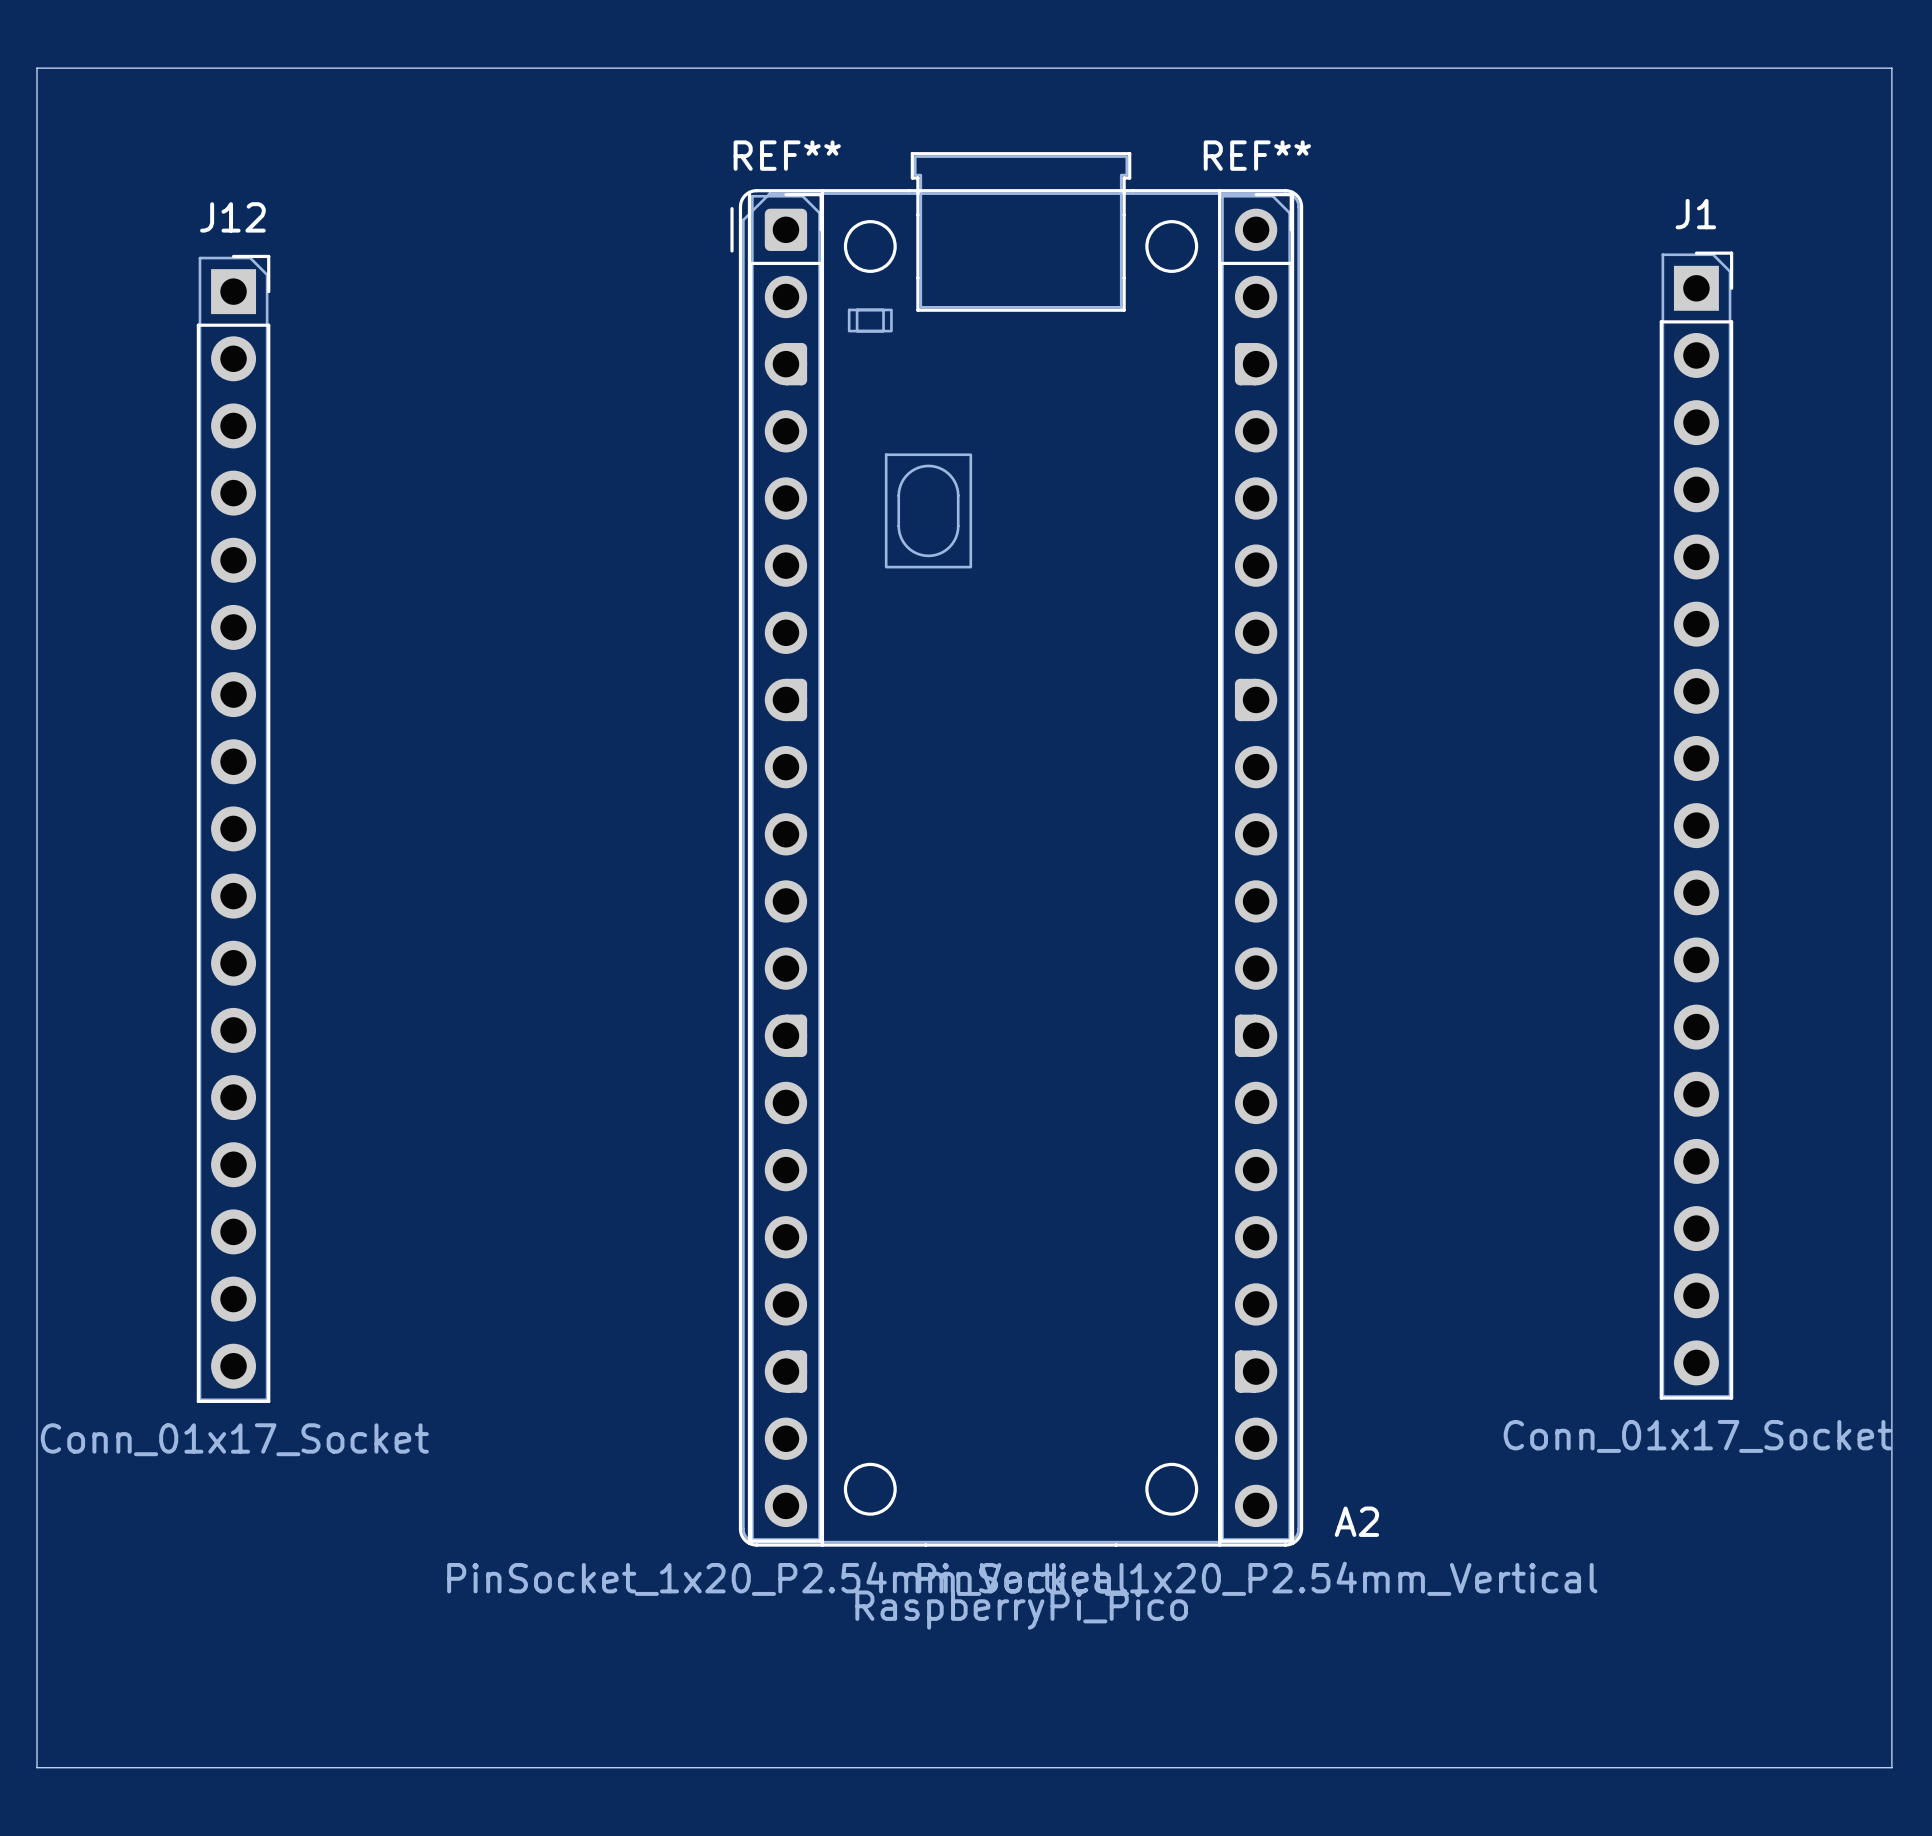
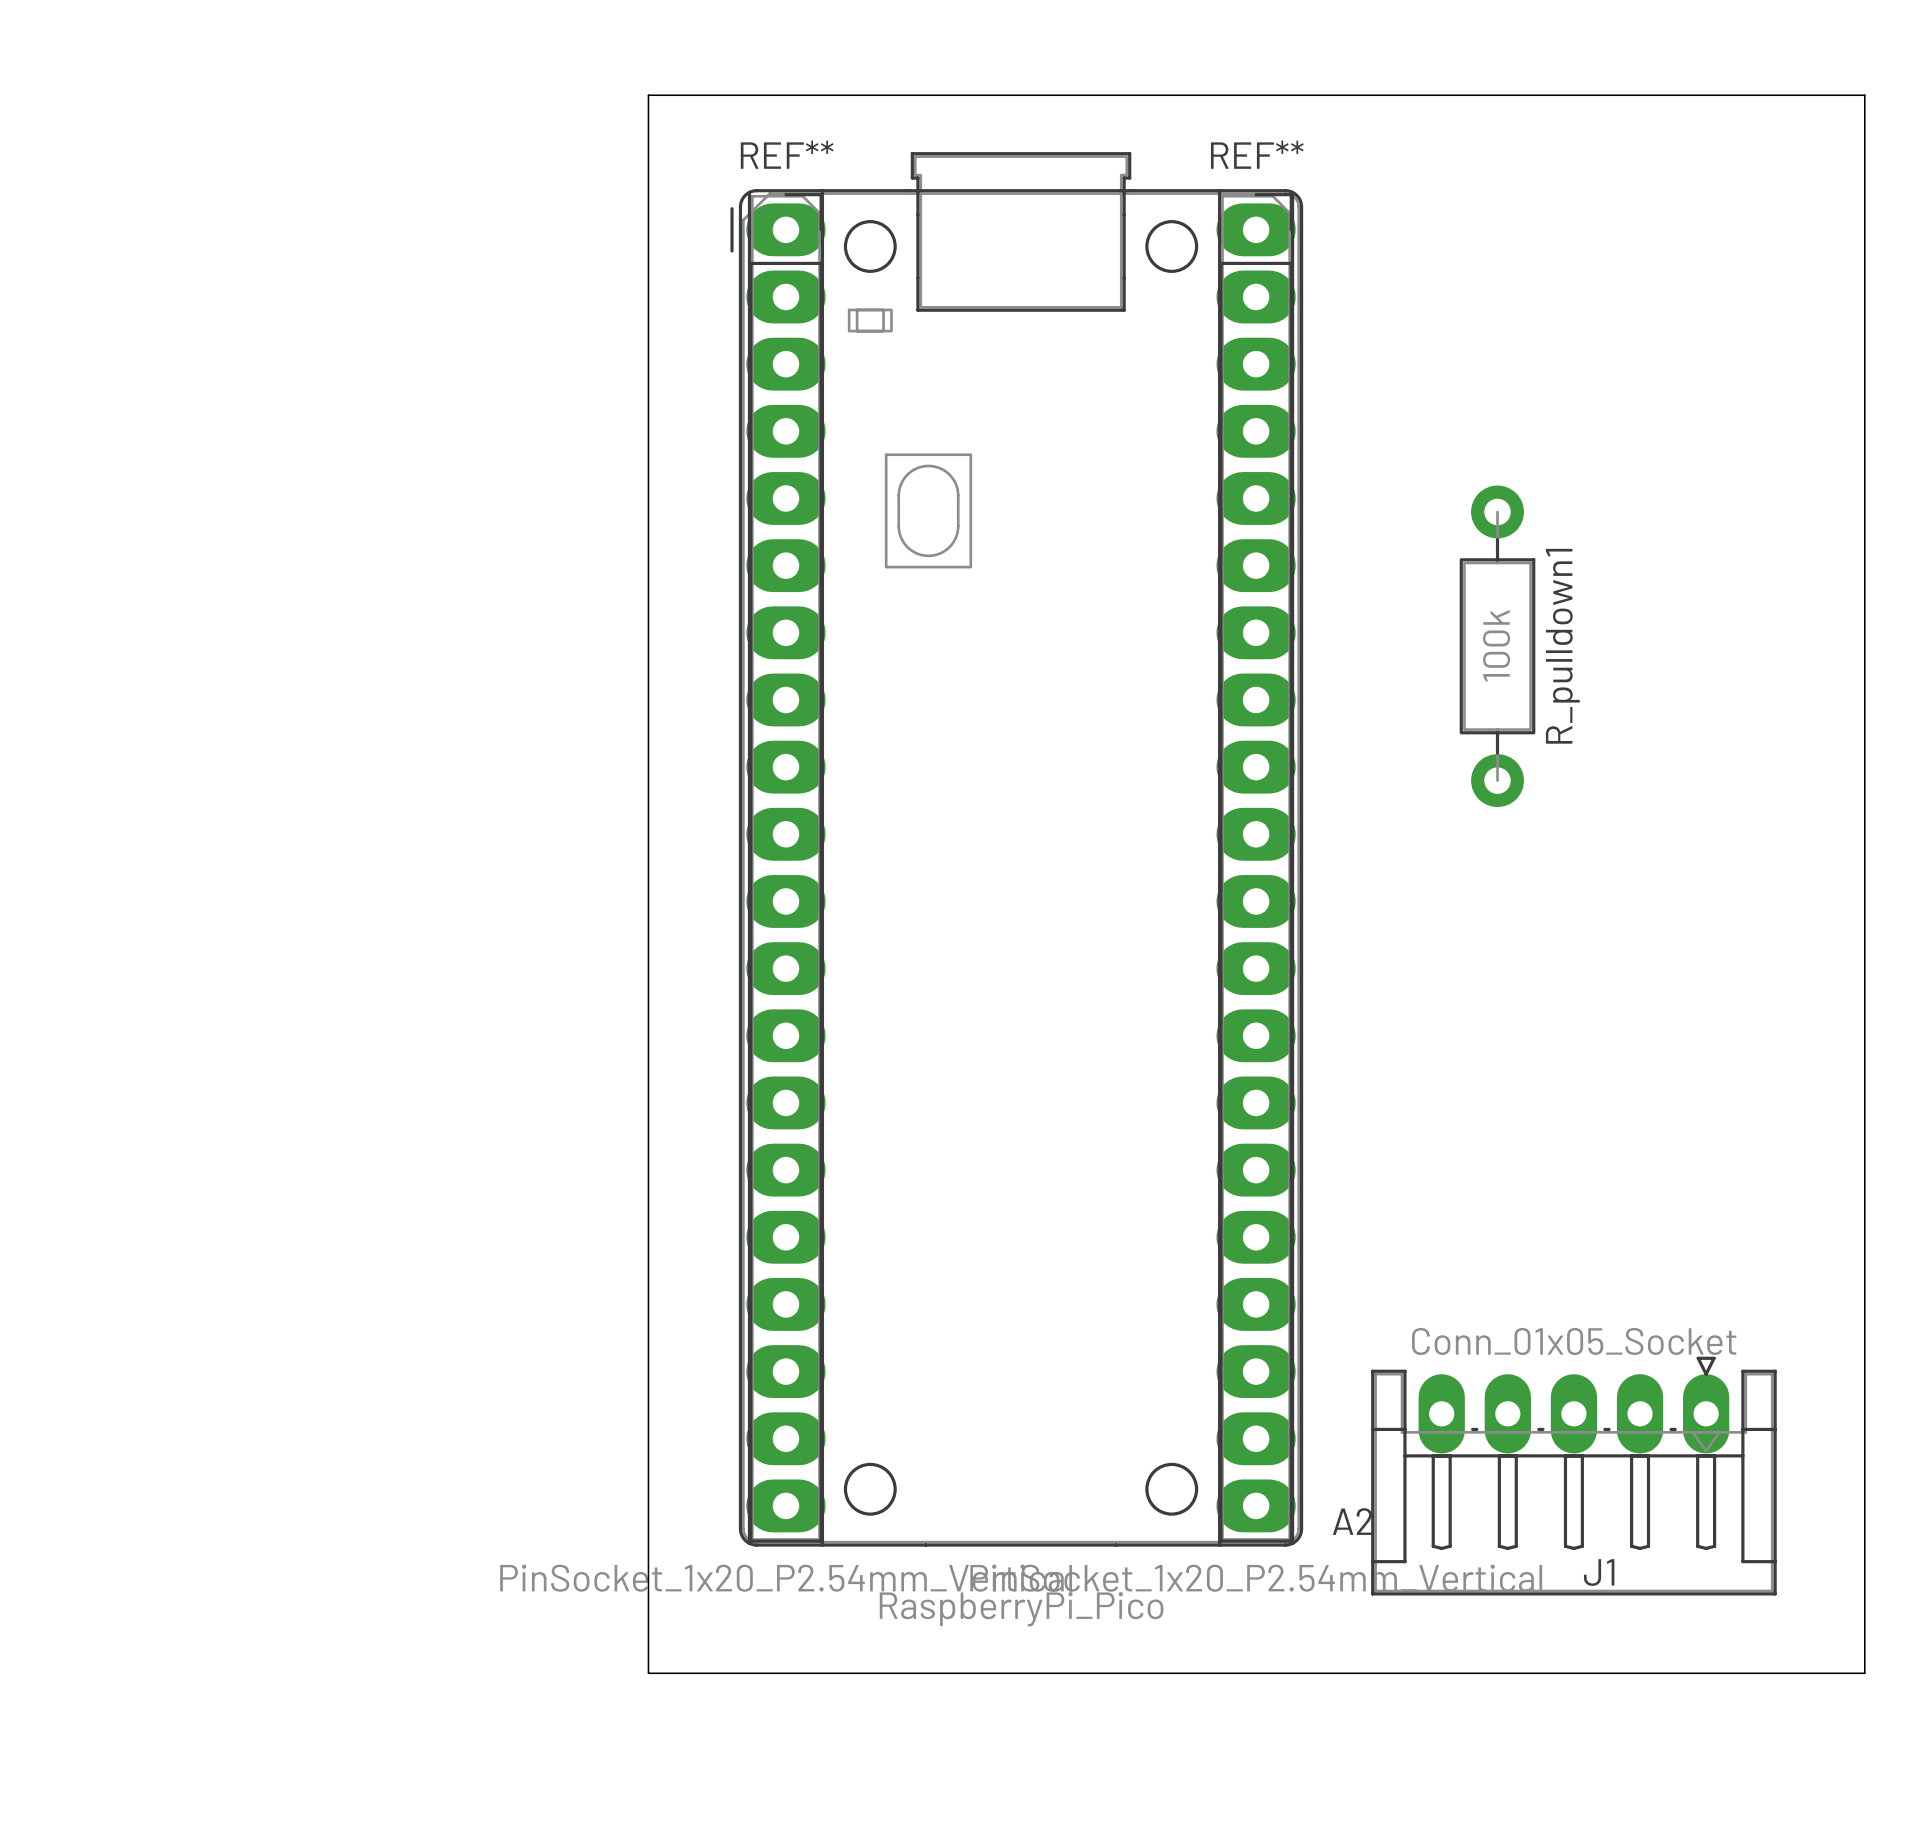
board edge: (36, 68) (1891, 68) (1891, 1767) (36, 1767) (36, 68) -> (648, 95) (648, 1673) (1864, 1673) (1864, 95) (648, 95)
A2 footprint: [730, 152, 1304, 1547] -> [730, 152, 1304, 1547]
J1 name position: J1 (1695, 214) -> J1 (1599, 1572)
J1 footprint: [1659, 251, 1734, 1400] -> [1371, 1356, 1777, 1596]
R_pulldown1: none -> 100k (1497, 646)
J12: Conn_01x17_Socket (233, 828) -> none
J1 value: Conn_01x17_Socket (1697, 1436) -> Conn_01x05_Socket (1574, 1341)

